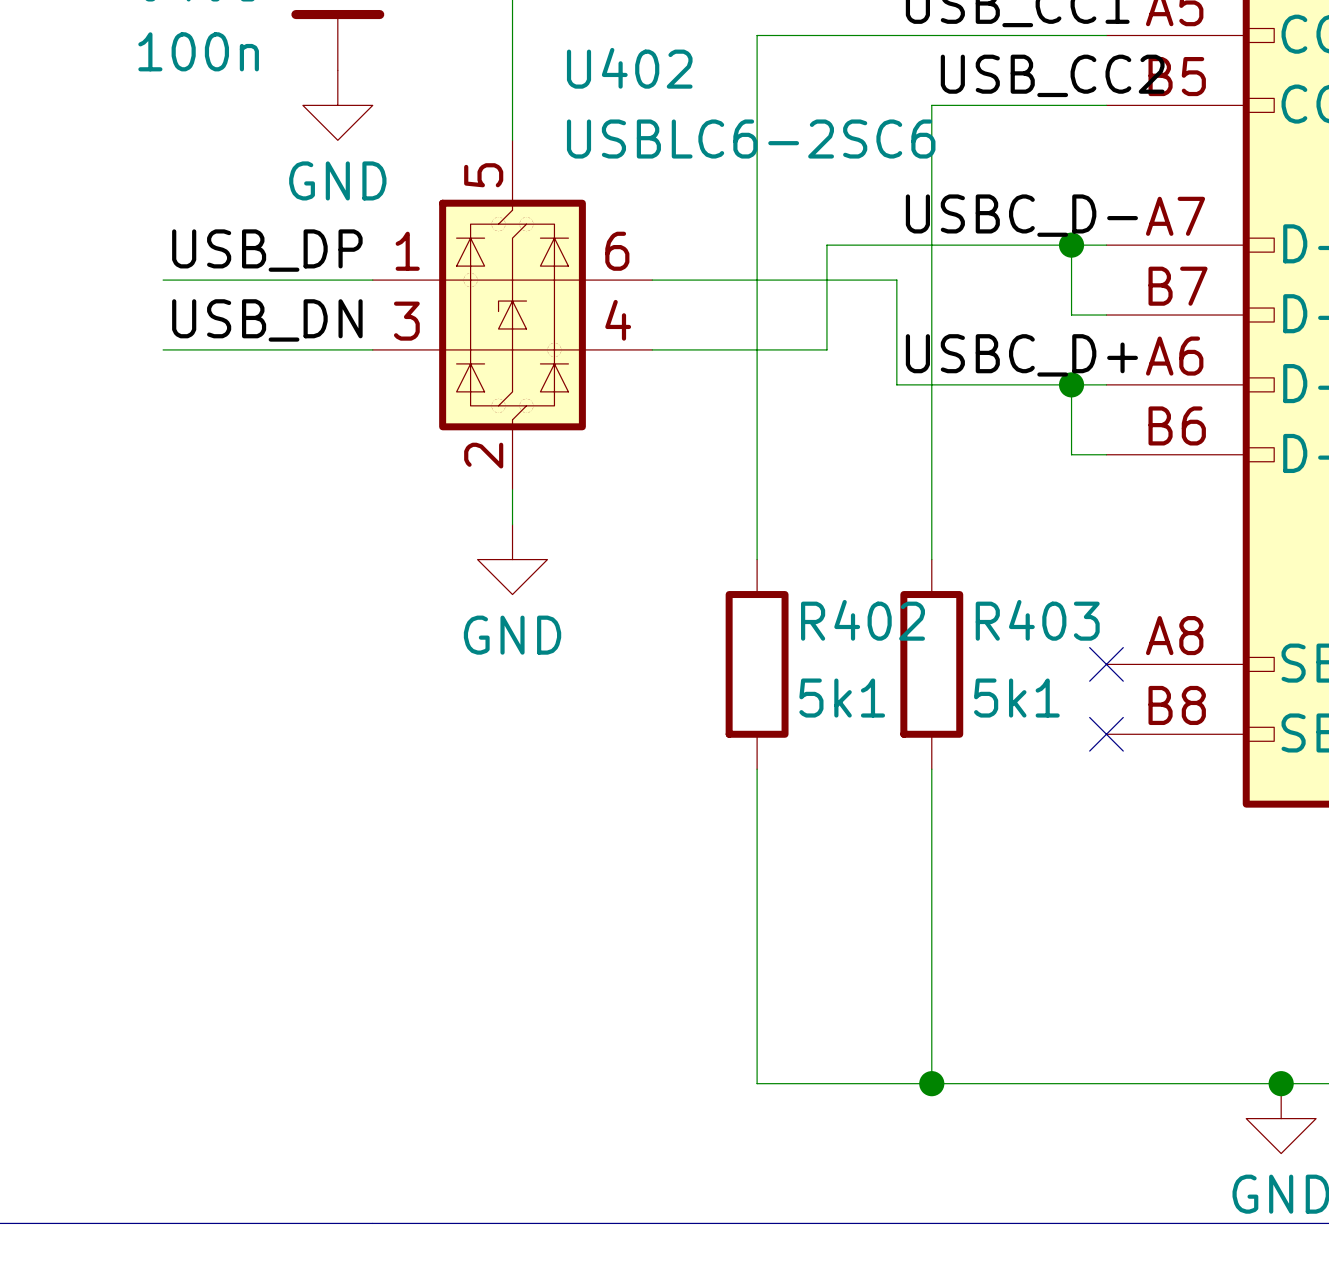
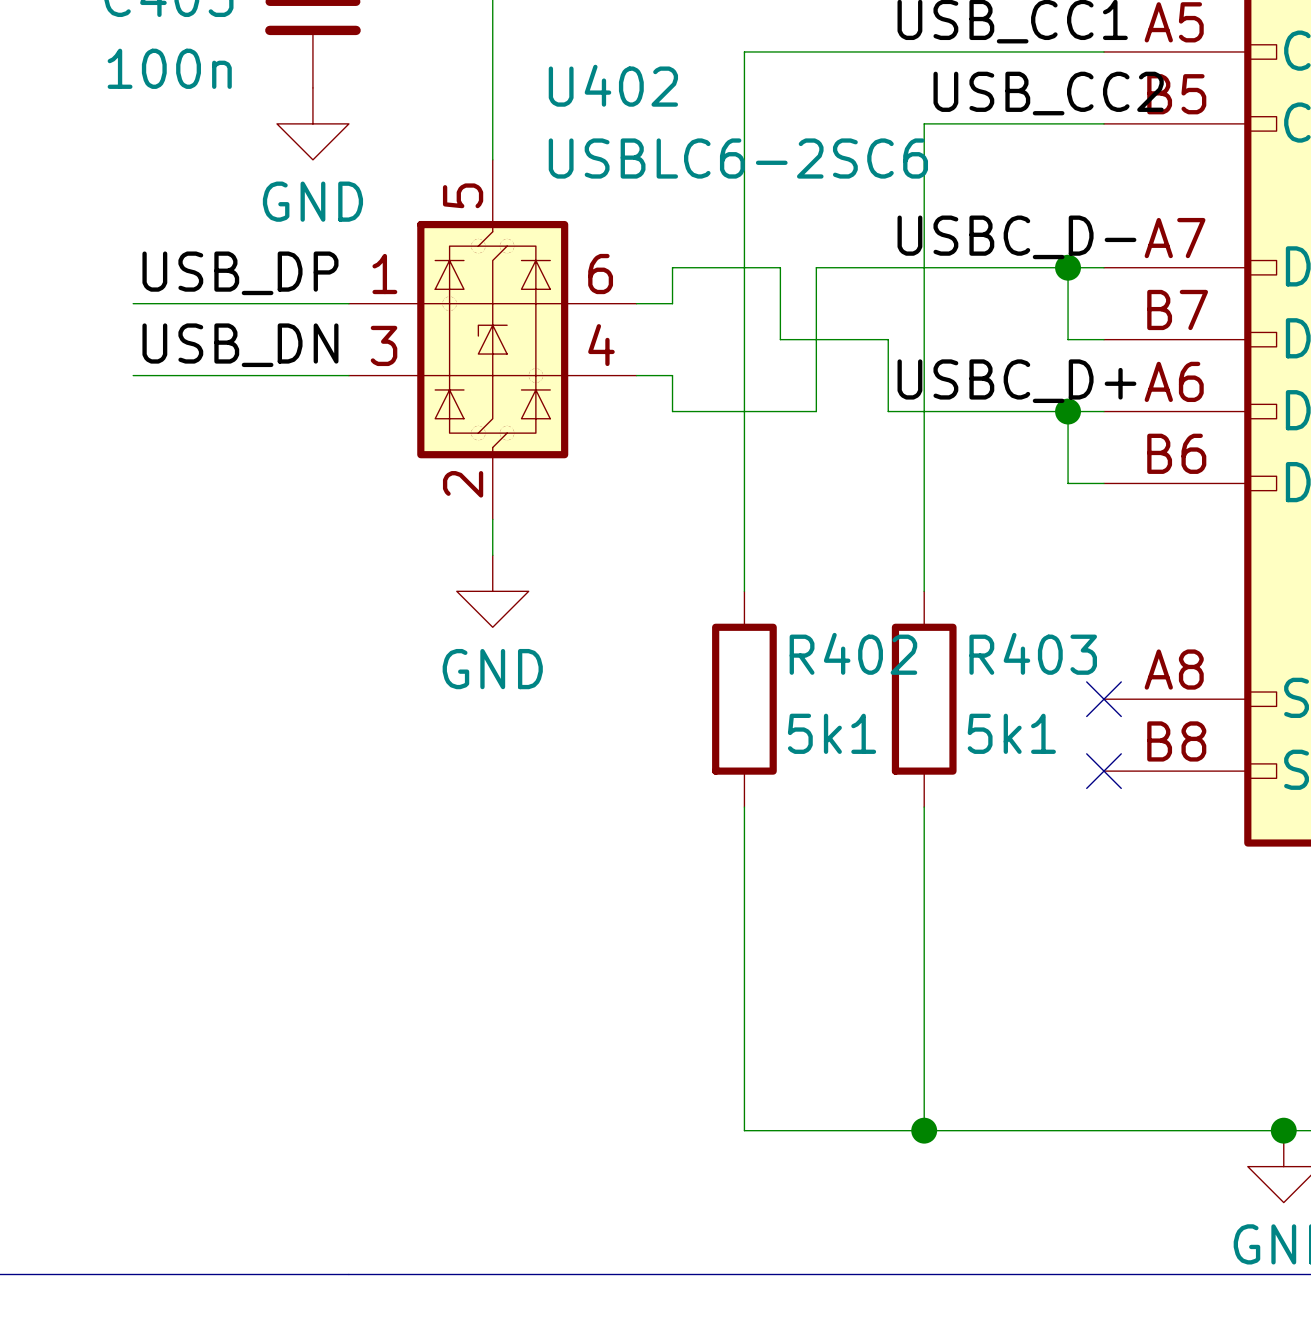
wire: (687, 280) (896, 280) (896, 315) -> (672, 303) (672, 267) (780, 267) (780, 339) (888, 339)
wire: (687, 349) (826, 349) -> (672, 375) (672, 411) (816, 411) (816, 375)

